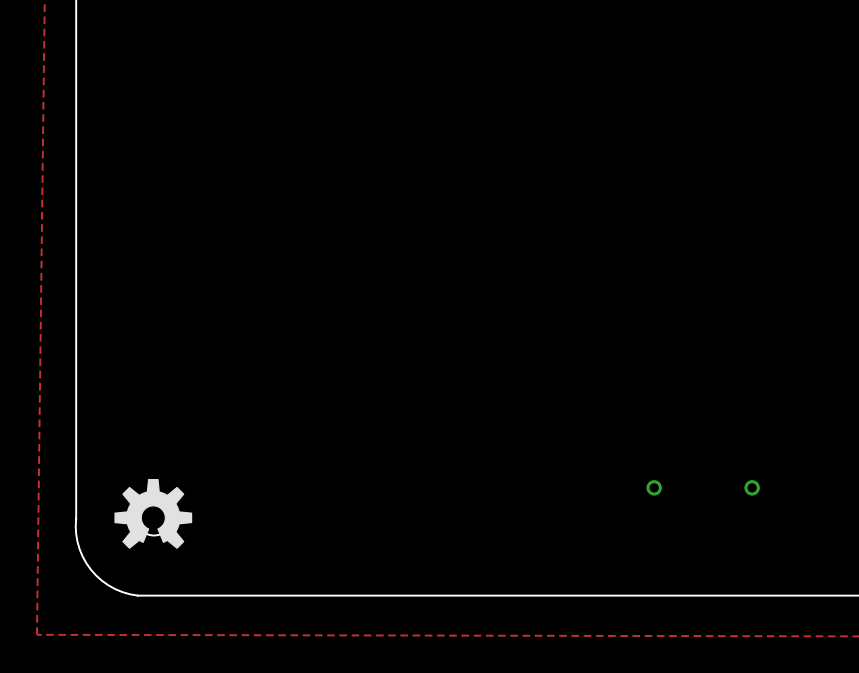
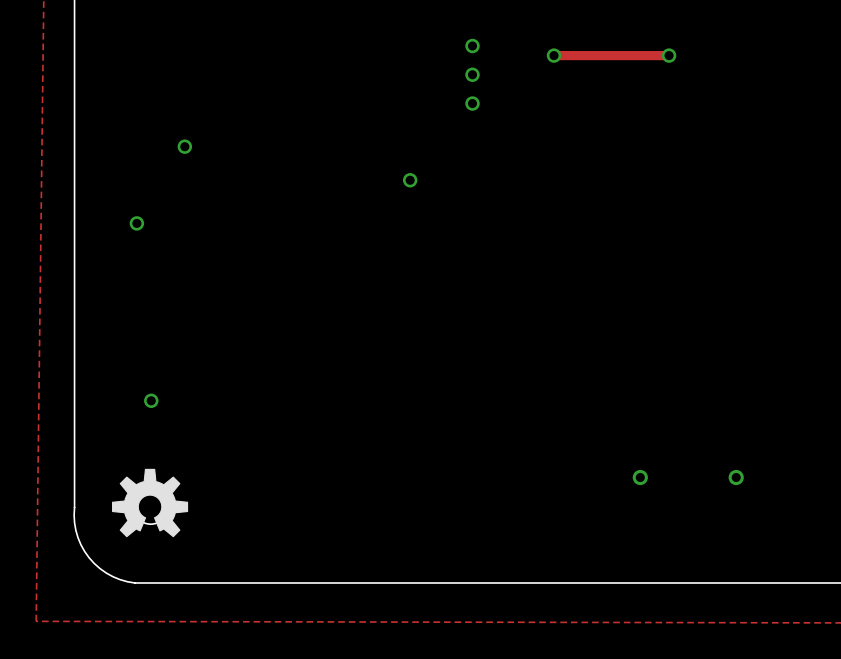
via: none -> (472, 46)
track: none -> (554, 55) (669, 55)
via: none -> (554, 55)
via: none -> (669, 55)
via: none -> (472, 74)
via: none -> (472, 103)
via: none -> (184, 146)
via: none -> (410, 180)
via: none -> (136, 223)
via: none -> (151, 400)

